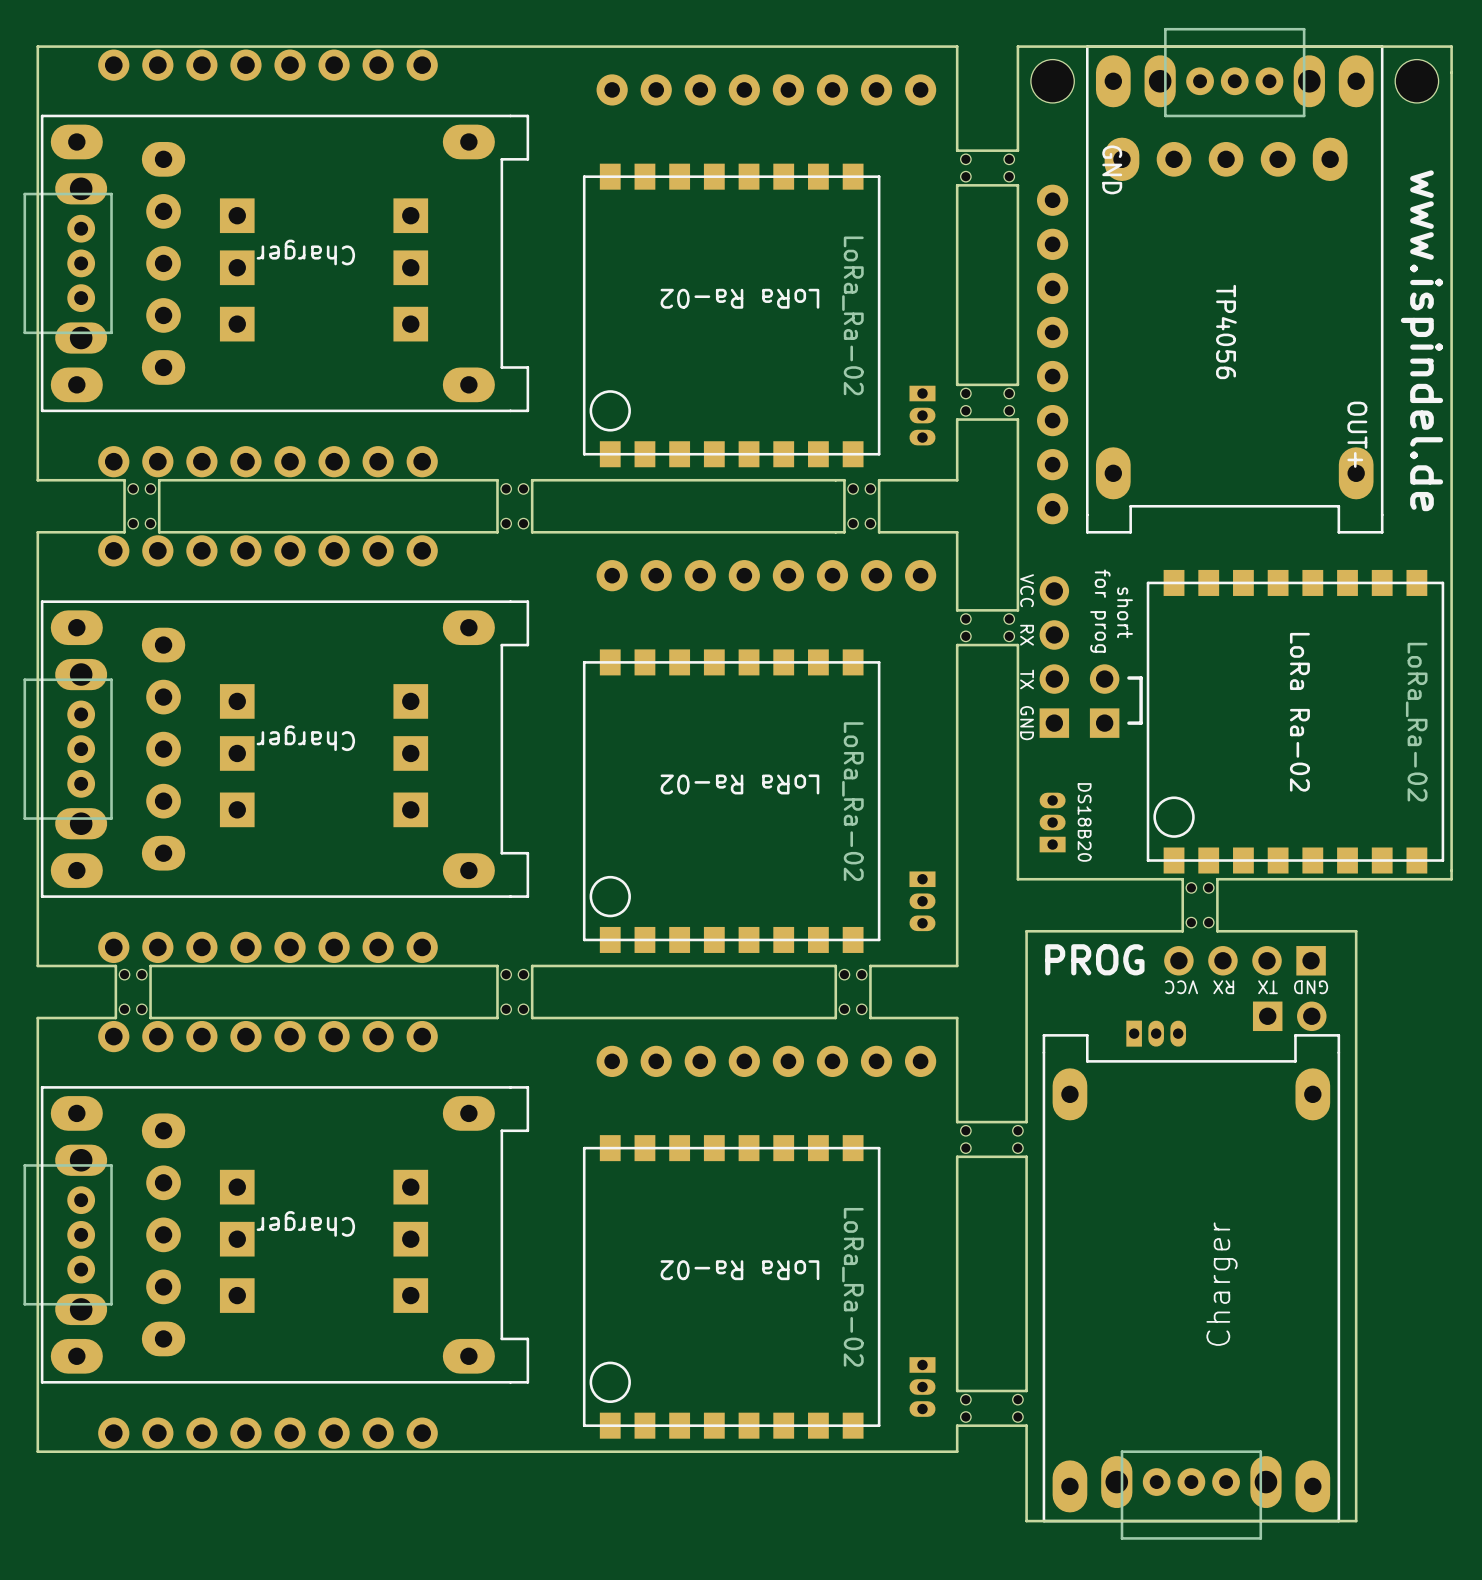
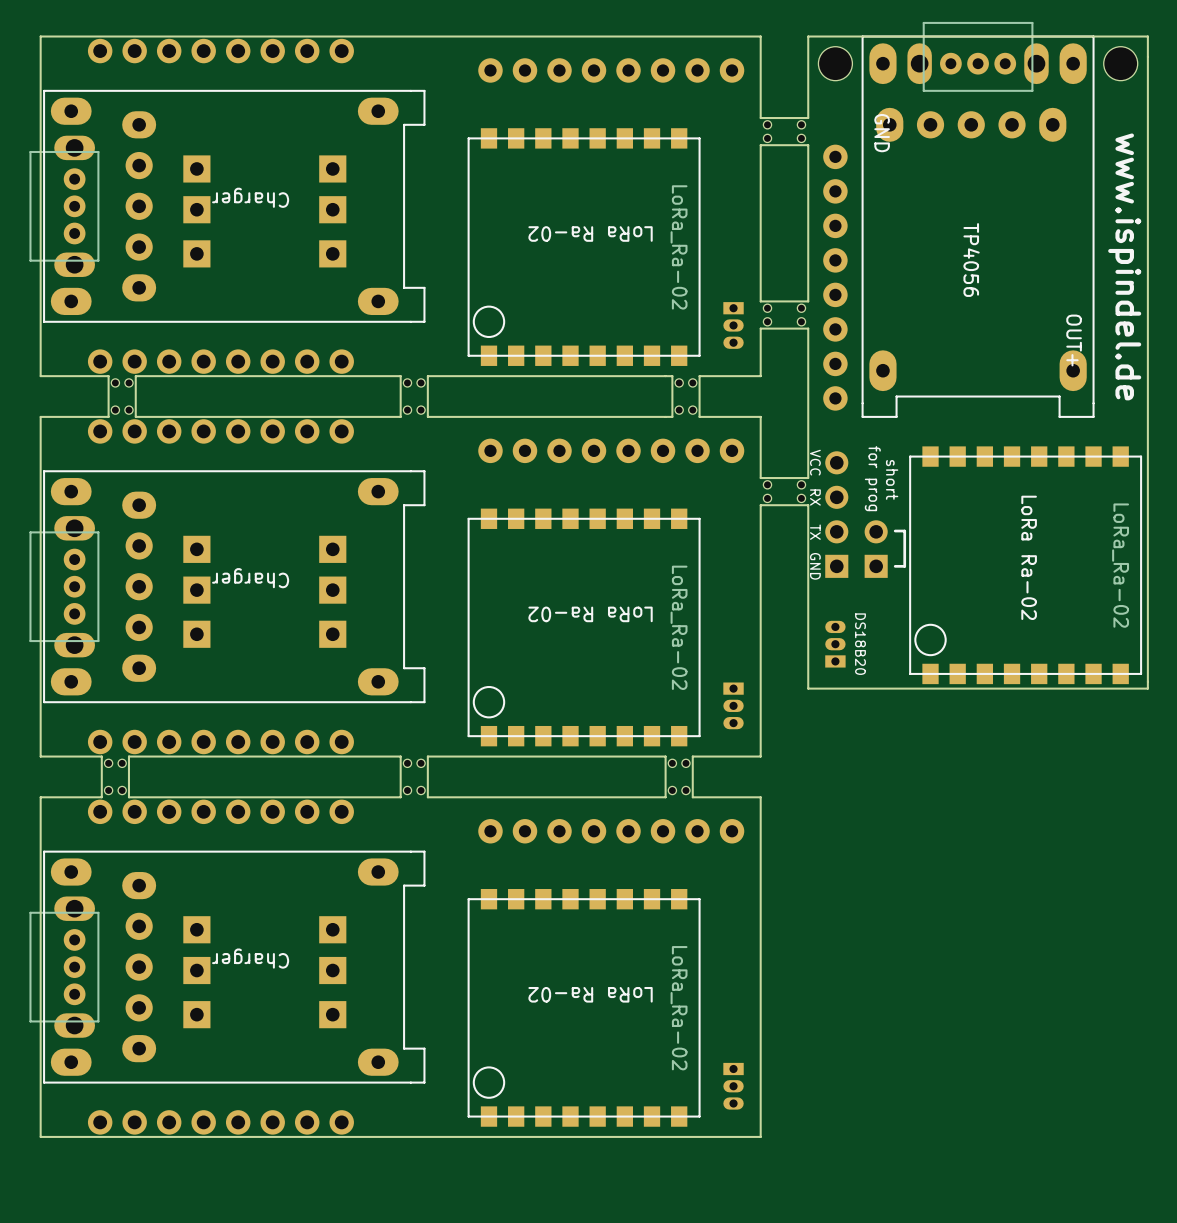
board edge: (1182, 879) (1182, 931) (1026, 931) (1026, 1122) (957, 1122) -> (937, 688) (964, 688)
board edge: (1217, 879) (1217, 931) (1356, 931) (1356, 1521) (1026, 1521) (1026, 1425) (957, 1425) -> (760, 1089) (760, 1116)
part: (1191, 887) -> none
part: (1208, 887) -> none
part: (1191, 922) -> none
part: (1208, 922) -> none
part: (1244, 960) -> none
text: VCC (1181, 987) -> none
text: RX (1223, 987) -> none
text: TX (1268, 987) -> none
text: GND (1311, 987) -> none
part: PROG (1289, 1016) -> none
part: (1156, 1033) -> none
part: (965, 1130) -> none
part: (1017, 1130) -> none
part: (965, 1148) -> none
part: (1017, 1148) -> none
board edge: (957, 1156) (1026, 1156) (1026, 1390) (957, 1390) -> (760, 905) (760, 878)
text: Charger (1221, 1284) -> none
part: (1191, 1286) -> none
part: (965, 1399) -> none
part: (1017, 1399) -> none
part: (965, 1417) -> none
part: (1017, 1417) -> none
part: (1191, 1482) -> none

